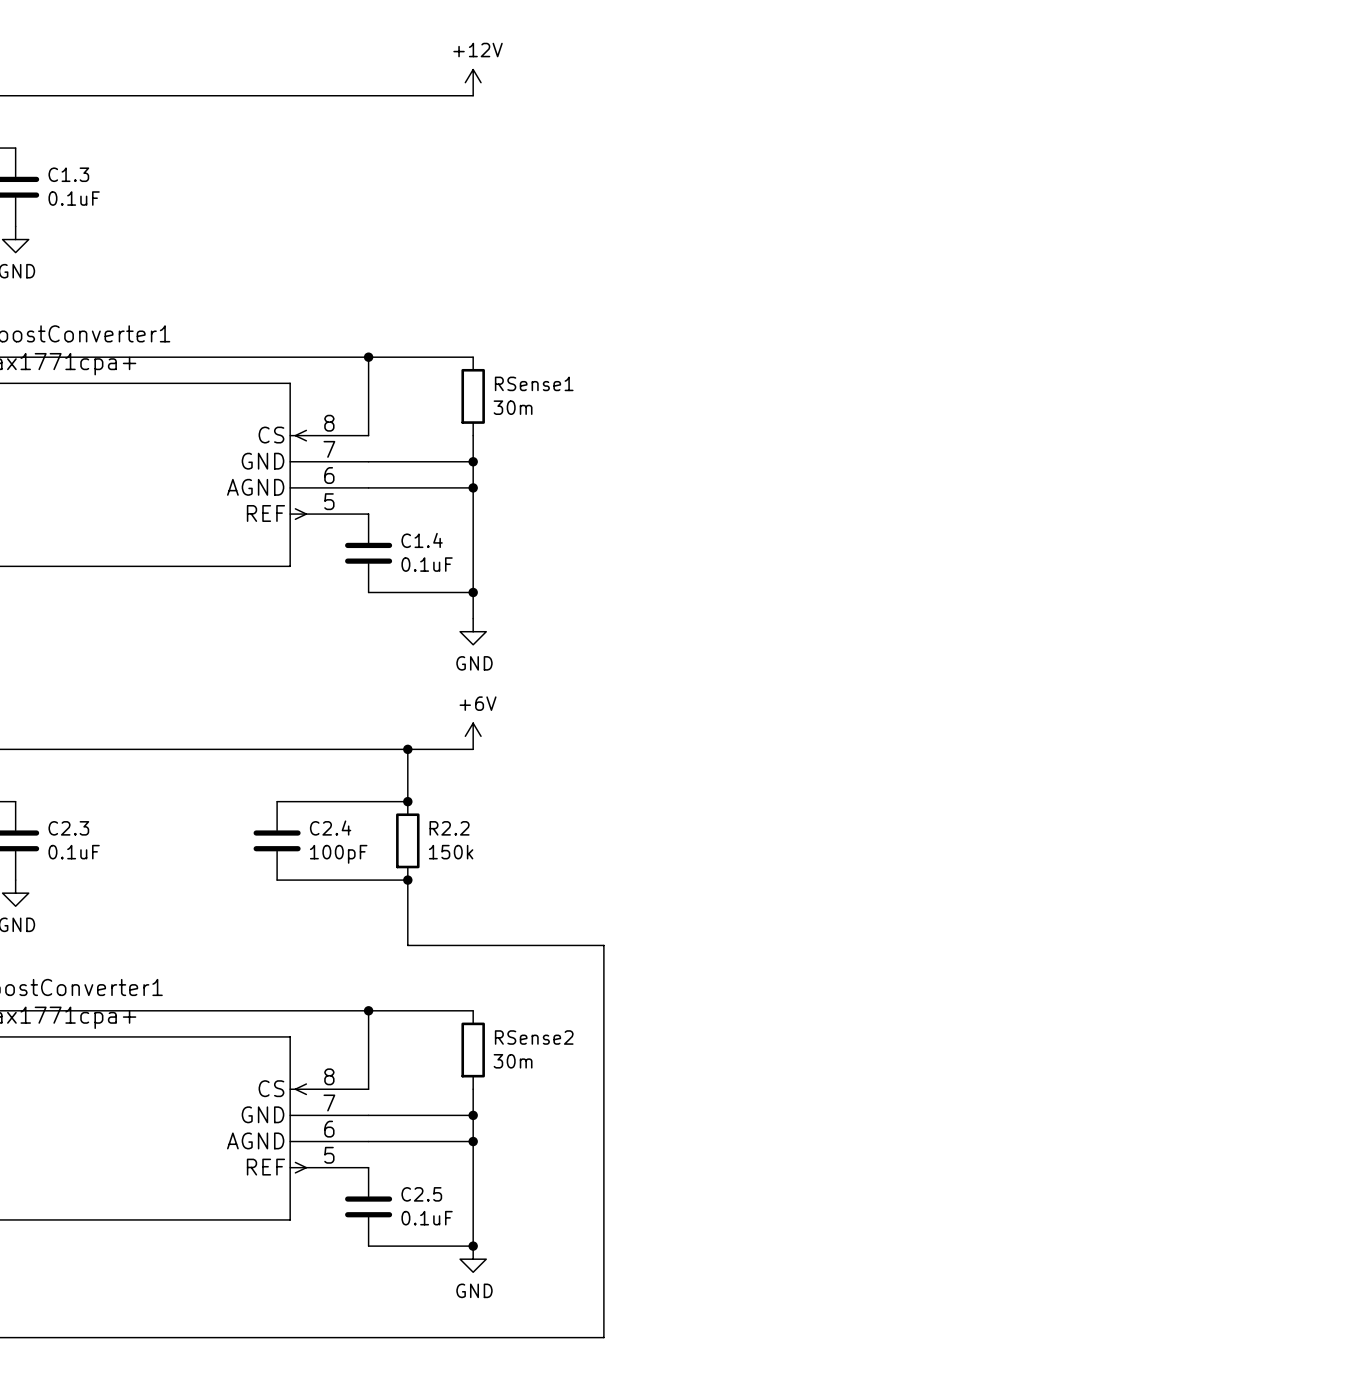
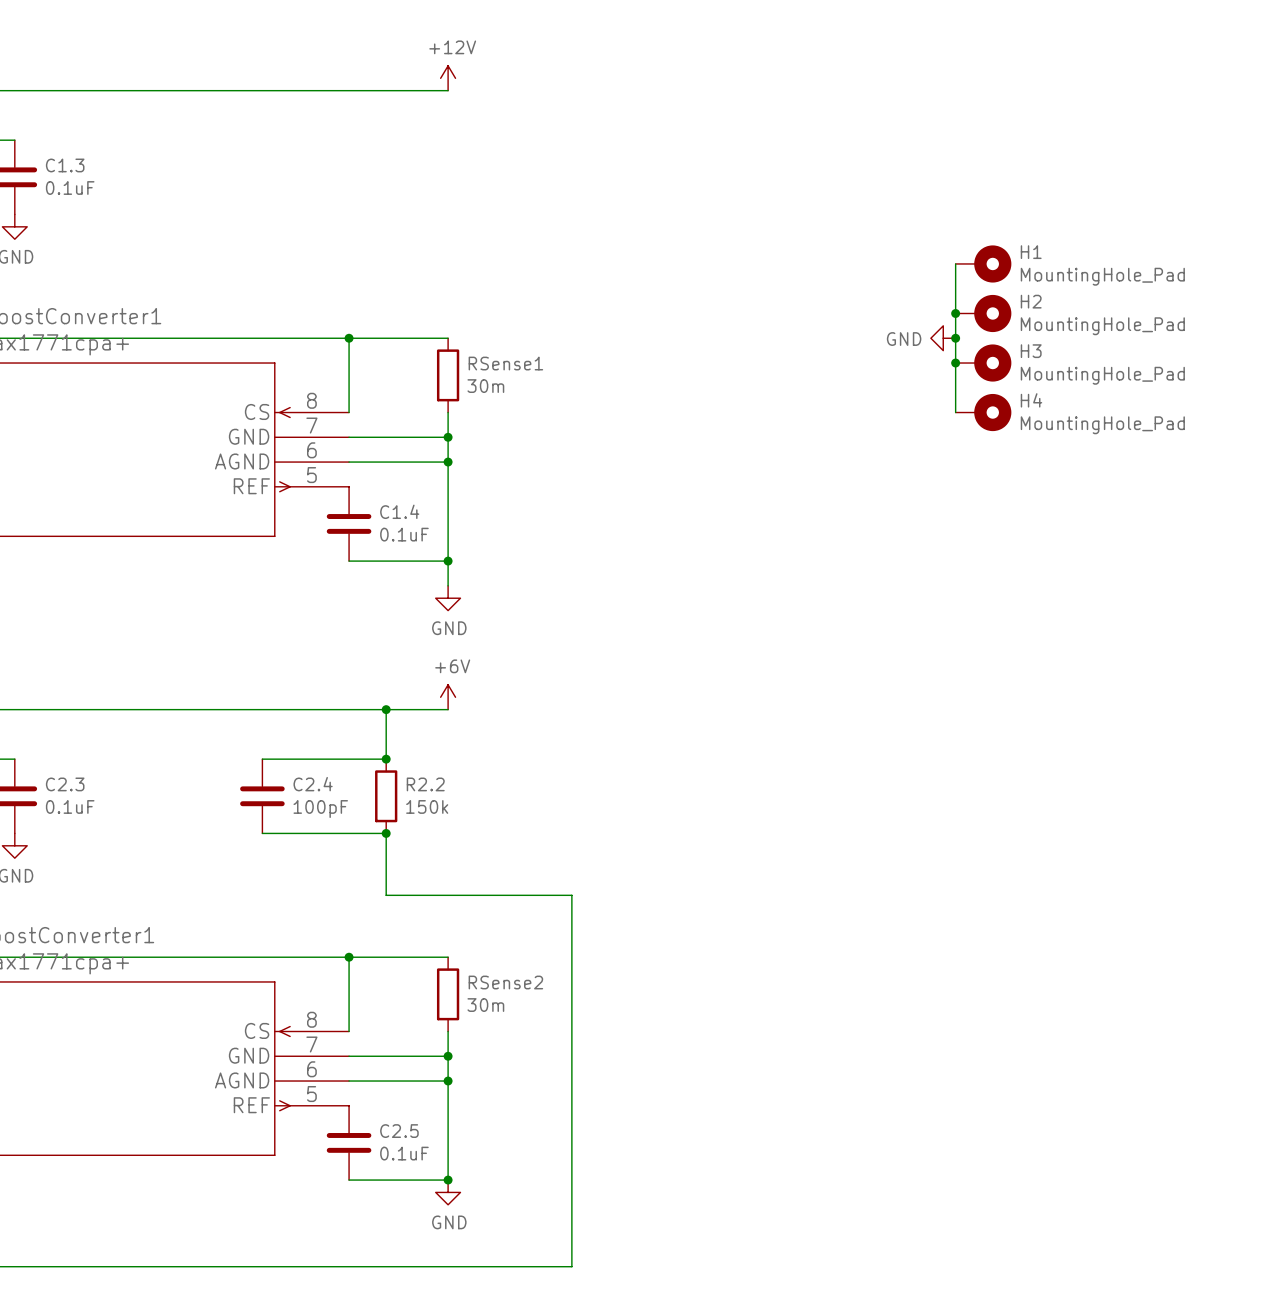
wire: none -> (955, 263) (955, 412)
H1: none -> MountingHole_Pad (983, 263)
junction: none -> (955, 313)
H2: none -> MountingHole_Pad (983, 313)
power symbol: none -> GND (943, 338)
junction: none -> (955, 338)
junction: none -> (955, 363)
H3: none -> MountingHole_Pad (983, 363)
H4: none -> MountingHole_Pad (983, 412)

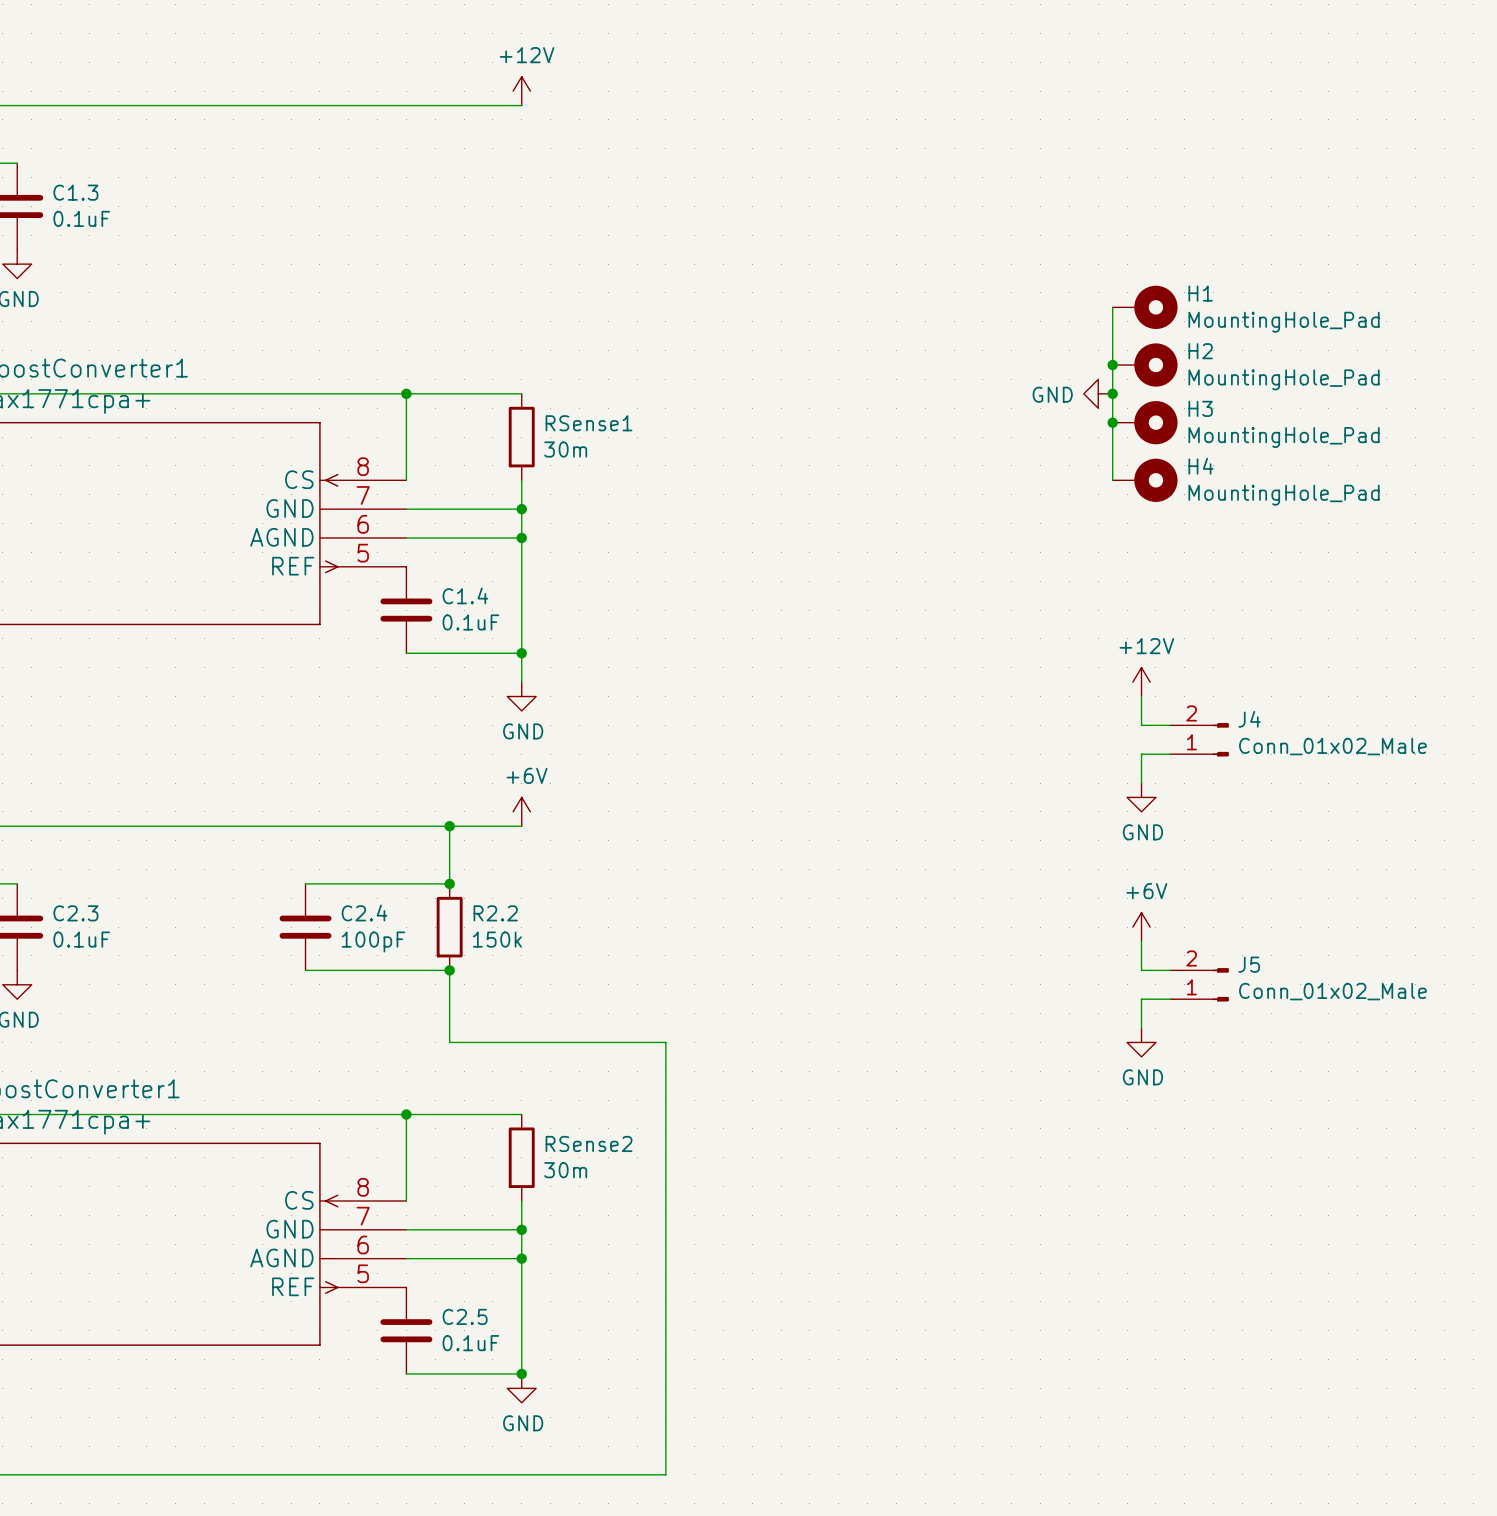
power symbol: none -> +12V (1141, 682)
wire: none -> (1141, 696) (1141, 725) (1170, 725)
J4: none -> Conn_01x02_Male (1199, 739)
wire: none -> (1170, 754) (1141, 754) (1141, 783)
power symbol: none -> GND (1141, 797)
power symbol: none -> +6V (1141, 927)
wire: none -> (1141, 941) (1141, 970) (1170, 970)
J5: none -> Conn_01x02_Male (1199, 984)
wire: none -> (1170, 999) (1141, 999) (1141, 1028)
power symbol: none -> GND (1141, 1042)

